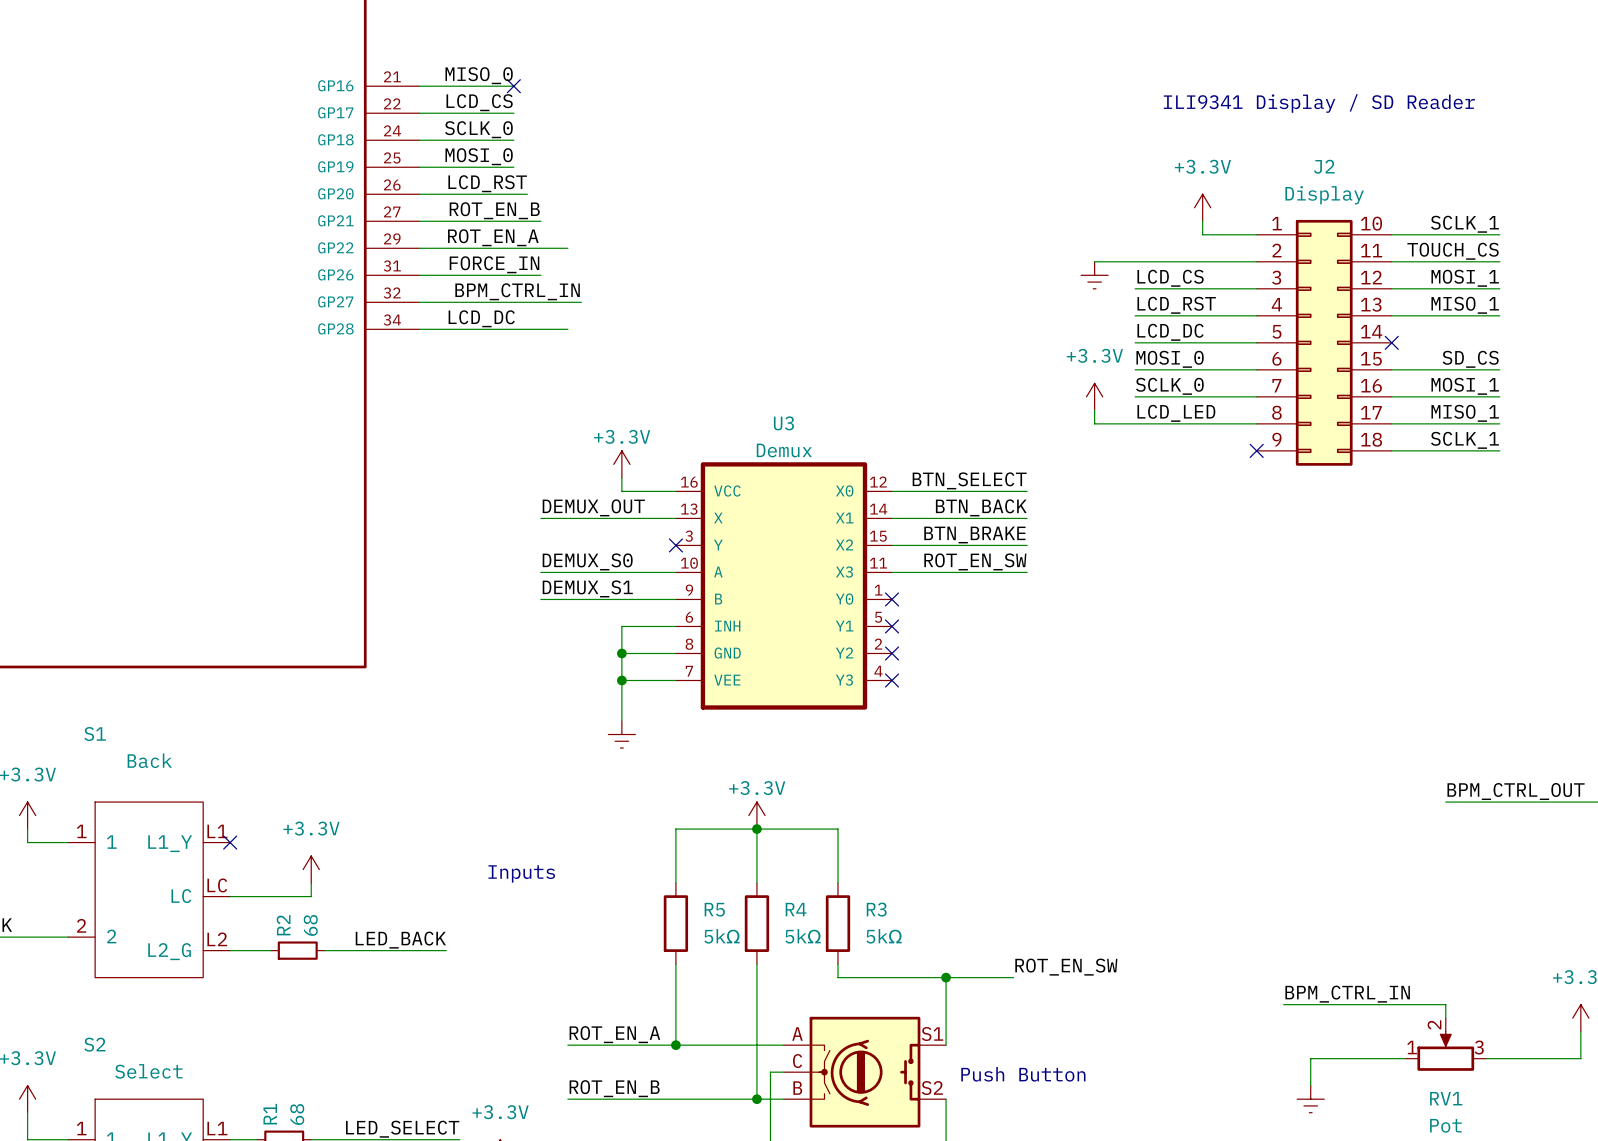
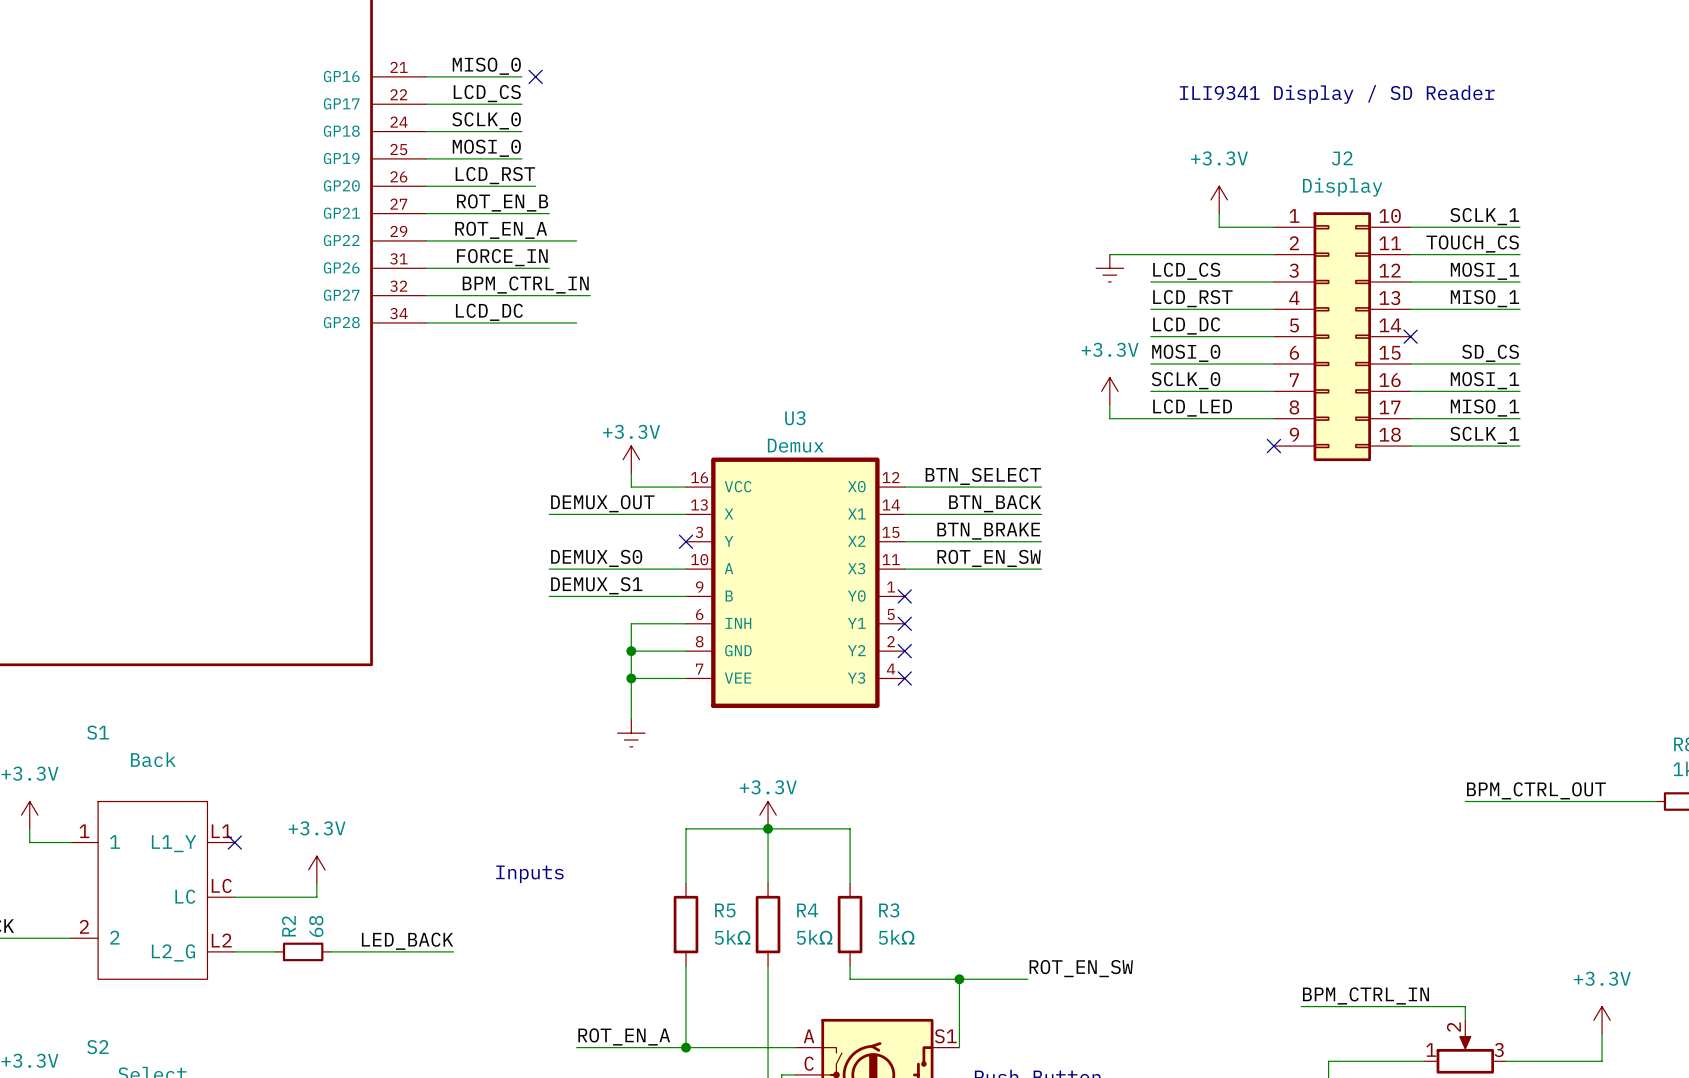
no-connect mark position: (513, 86) -> (535, 76)

